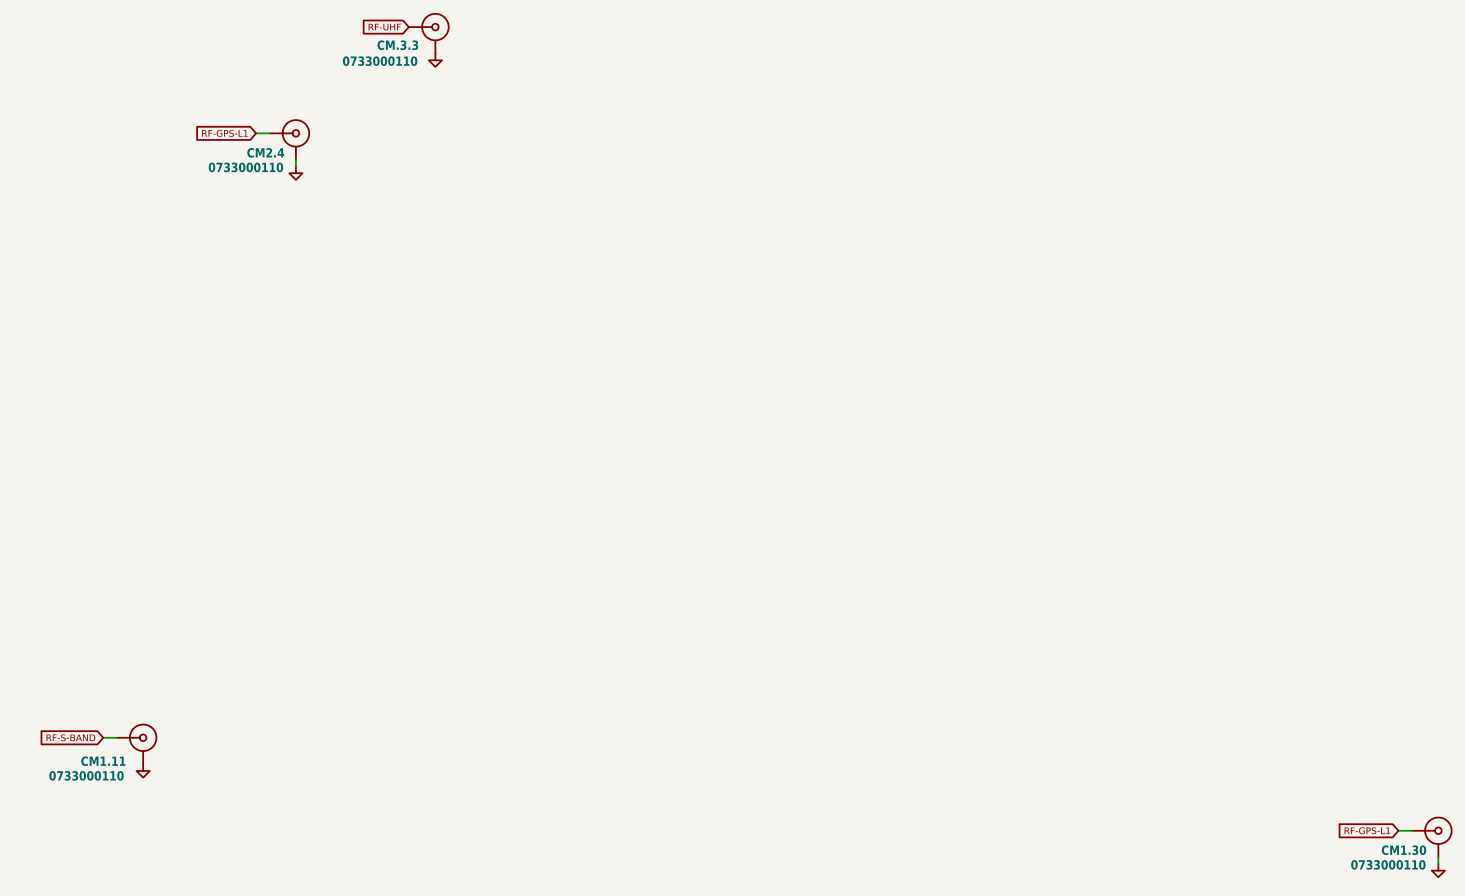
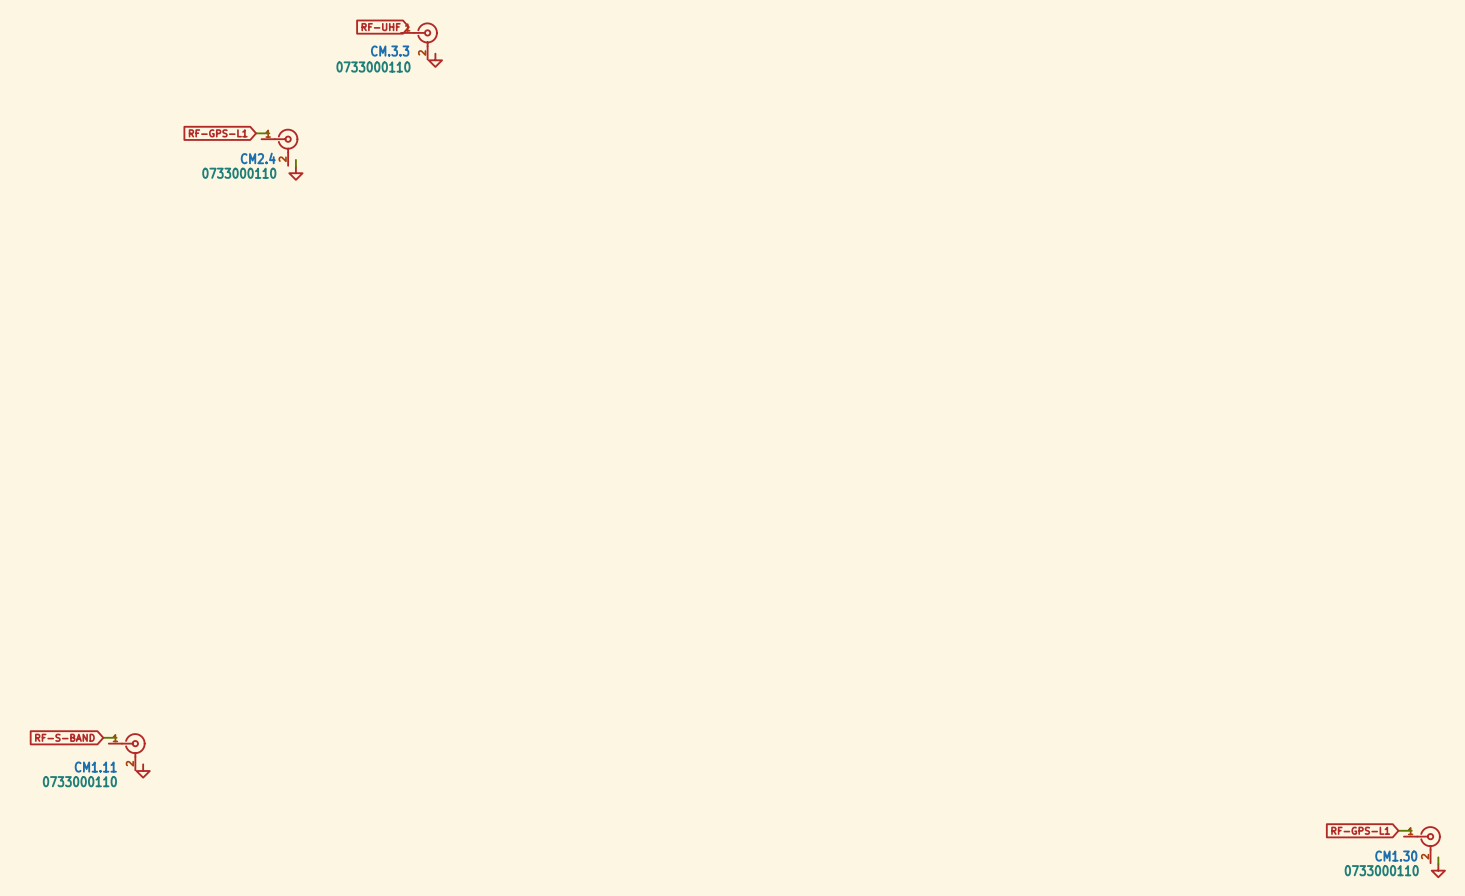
CM.3.3 symbol: [408, 13, 450, 54] -> [401, 22, 438, 60]
CM2.4 symbol: [269, 119, 310, 160] -> [261, 128, 299, 166]
CM1.11 symbol: [116, 723, 158, 765] -> [108, 733, 146, 771]
CM1.30 symbol: [1411, 816, 1453, 858] -> [1403, 826, 1441, 864]

